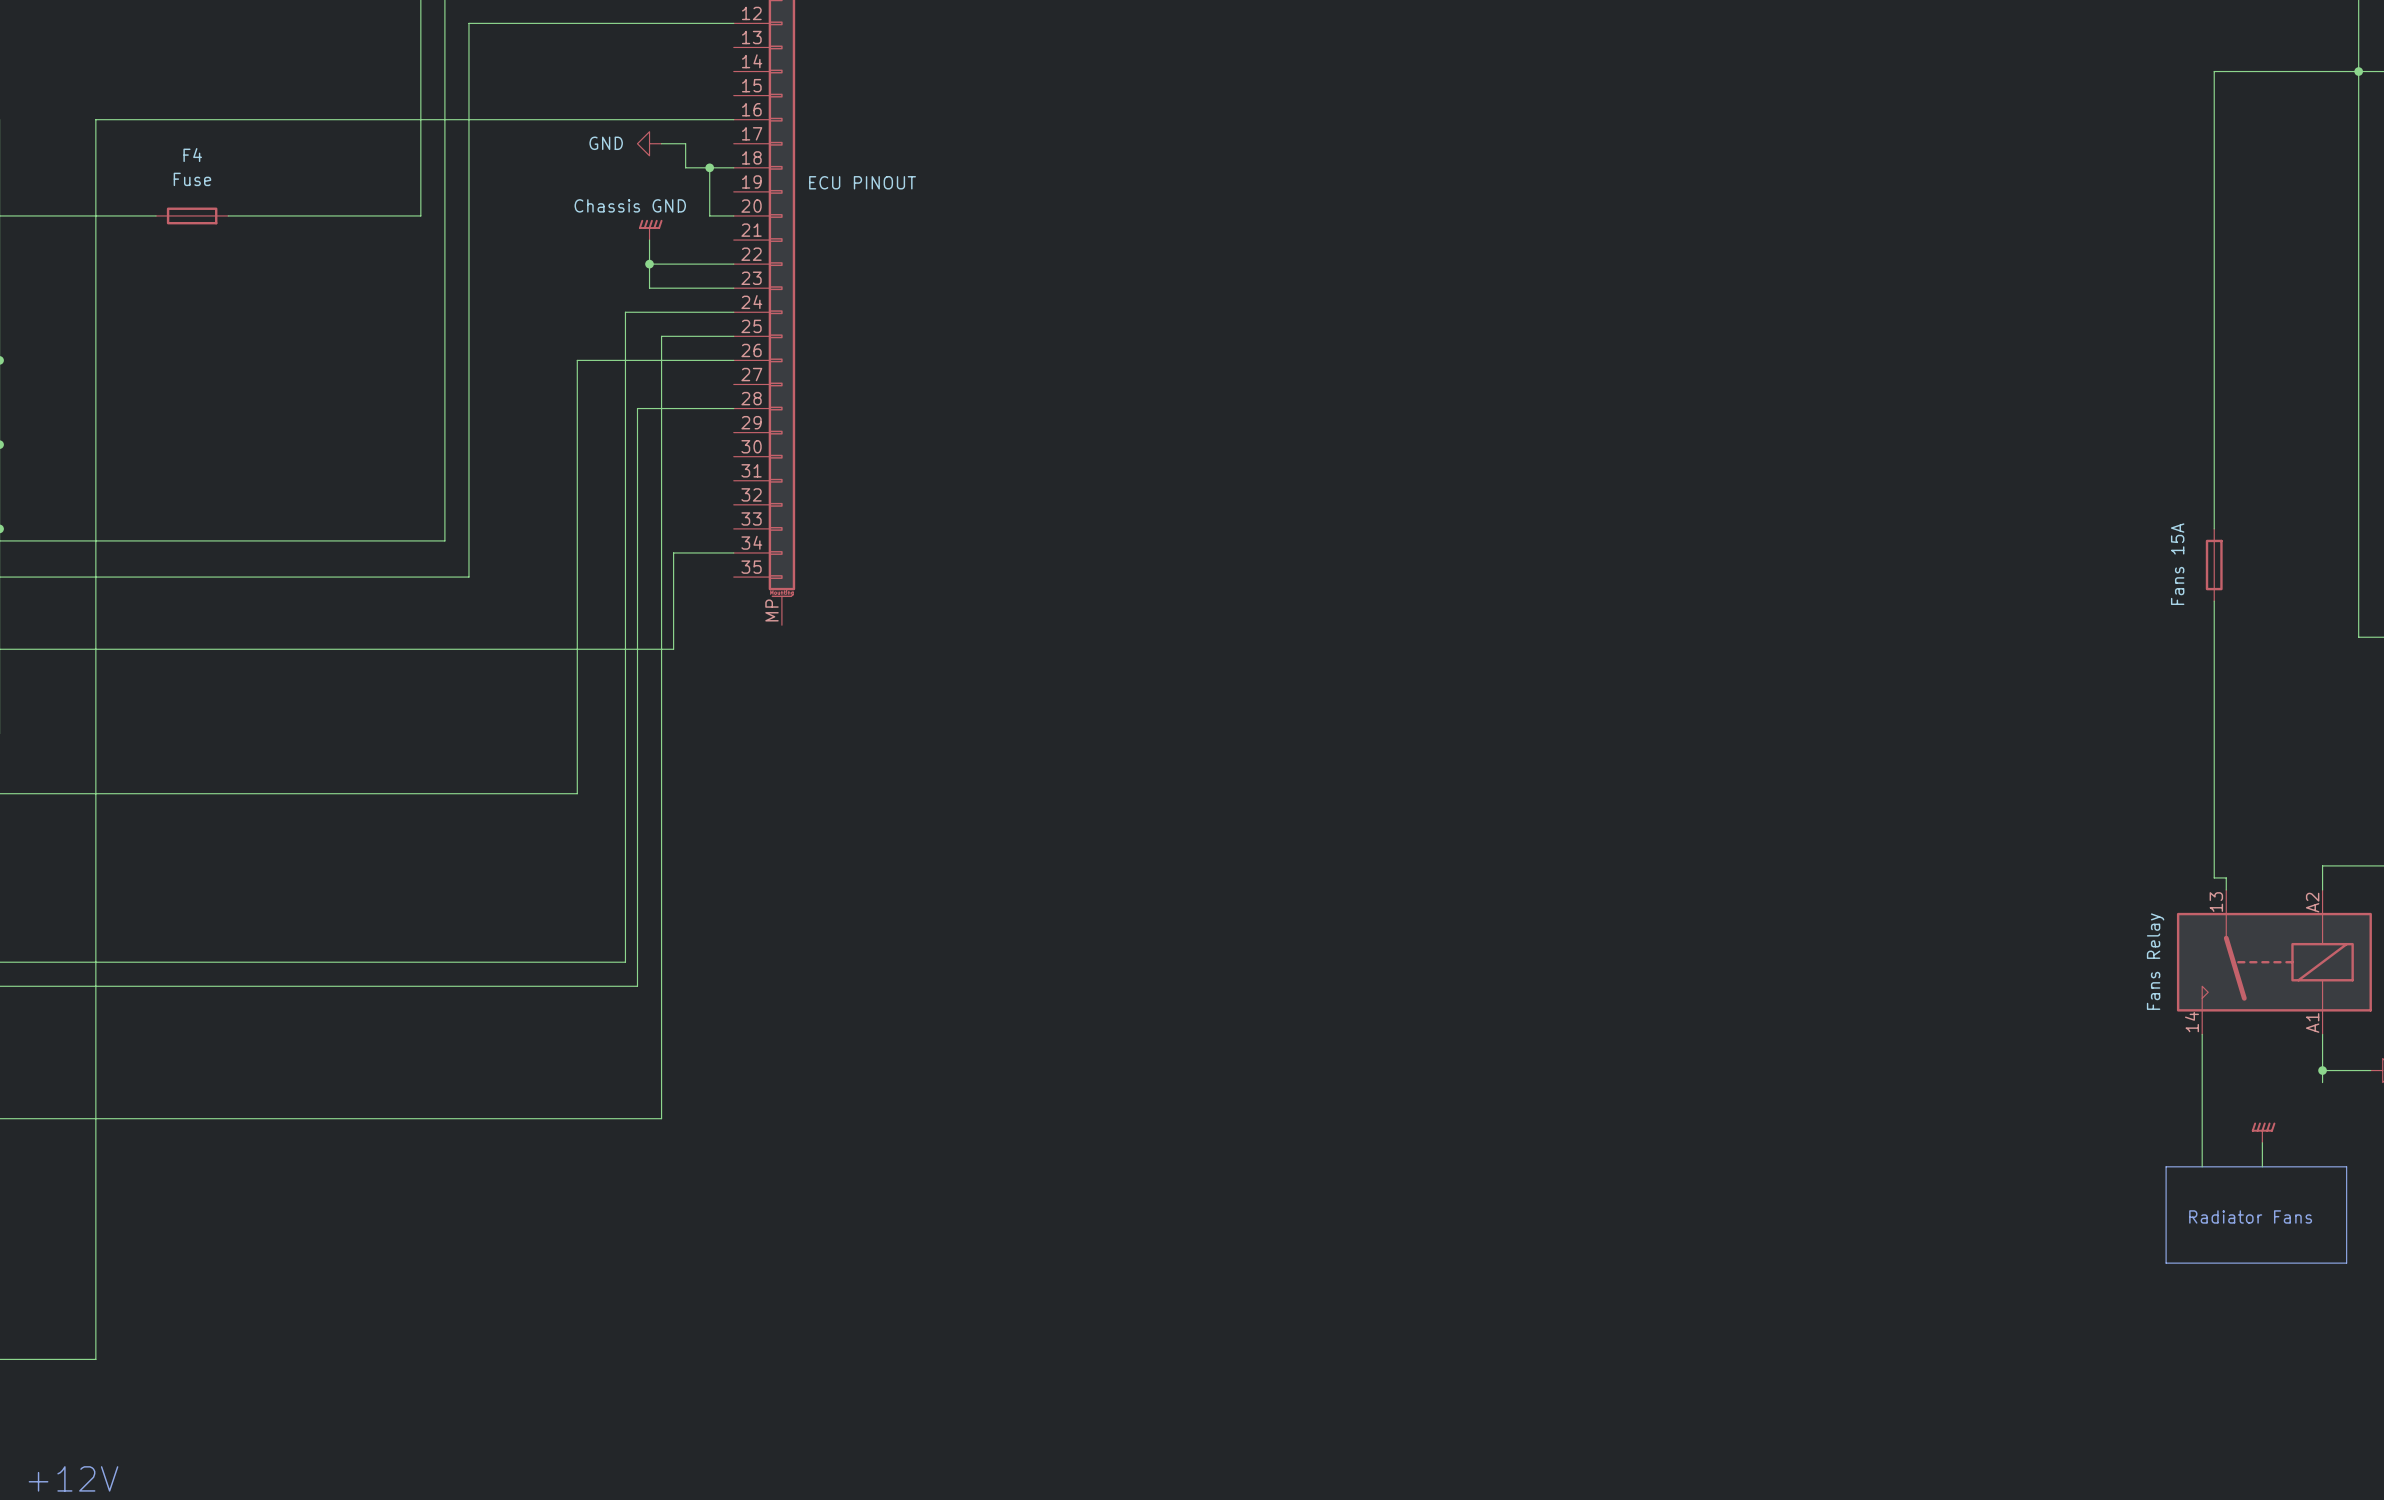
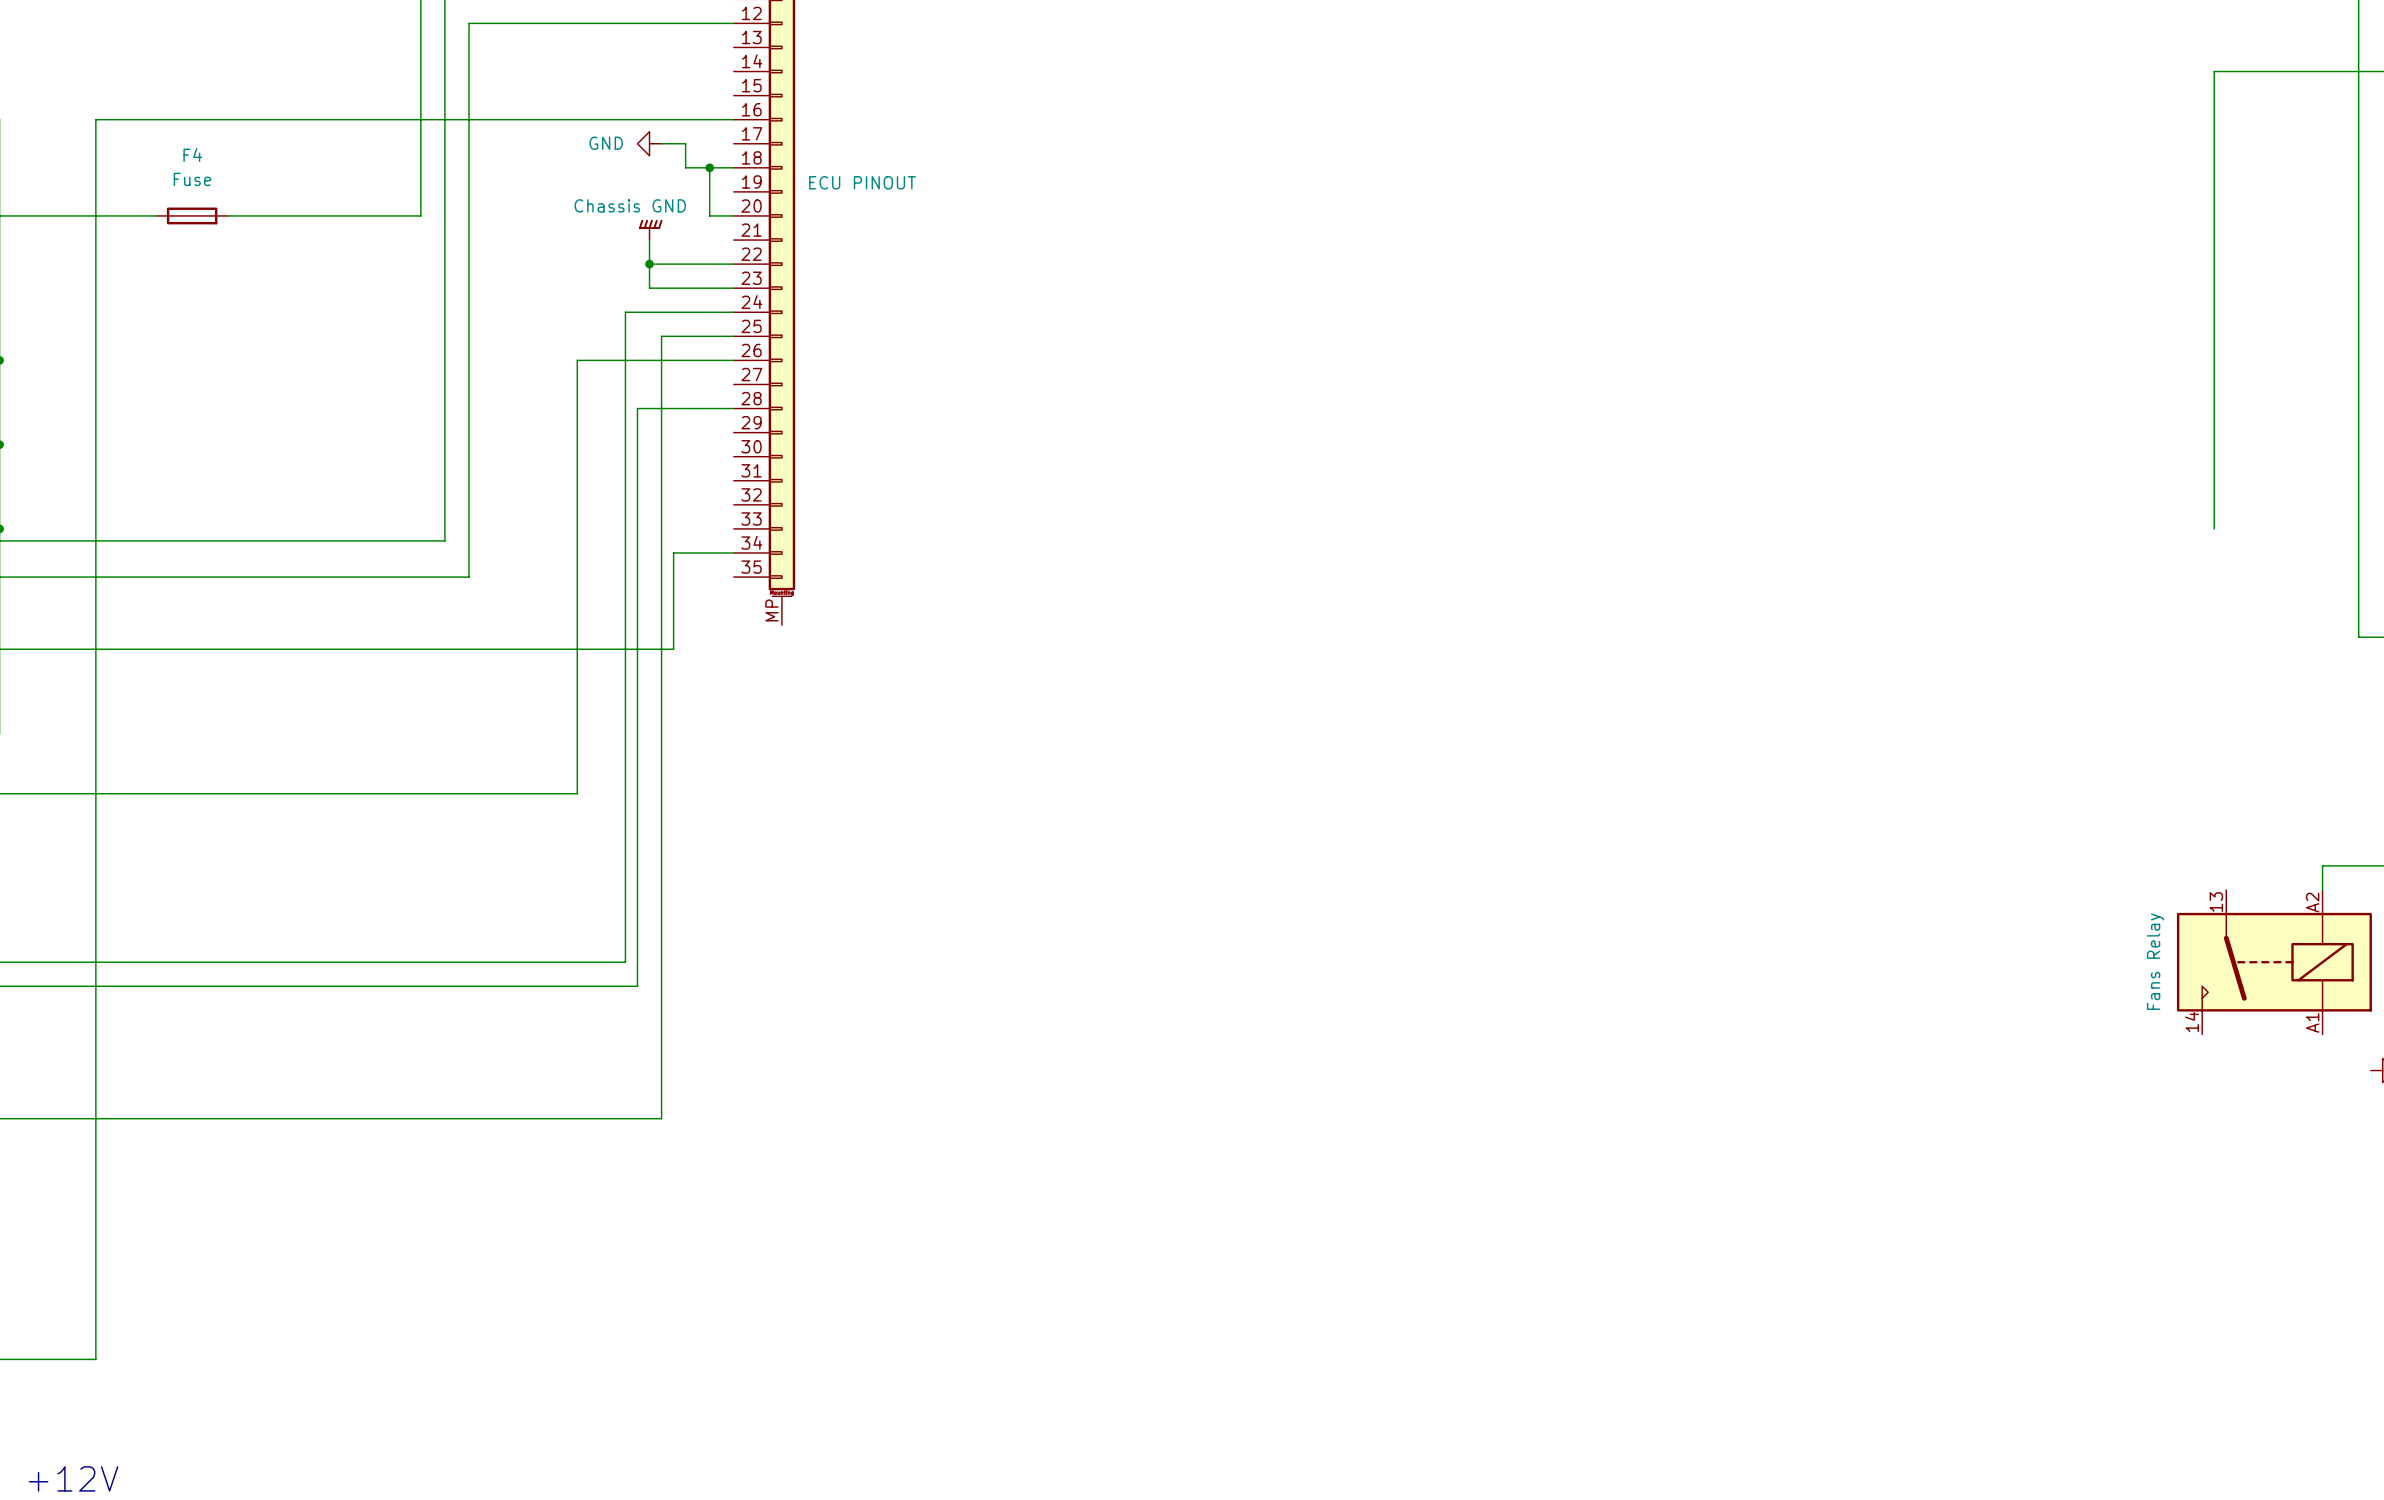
junction: (2358, 71) -> none
part: Fans 15A (2214, 565) -> none
wire: (2214, 601) (2214, 877) (2226, 877) (2226, 889) -> none
wire: (2202, 1034) (2202, 1166) -> none
wire: (2322, 1034) (2322, 1082) -> none
wire: (2322, 1070) (2370, 1070) -> none
junction: (2322, 1070) -> none
power symbol: (2263, 1132) -> none
wire: (2262, 1142) (2262, 1166) -> none
line: (2166, 1166) (2346, 1166) (2346, 1263) (2166, 1263) (2166, 1166) -> none
text: Radiator Fans (2250, 1216) -> none

